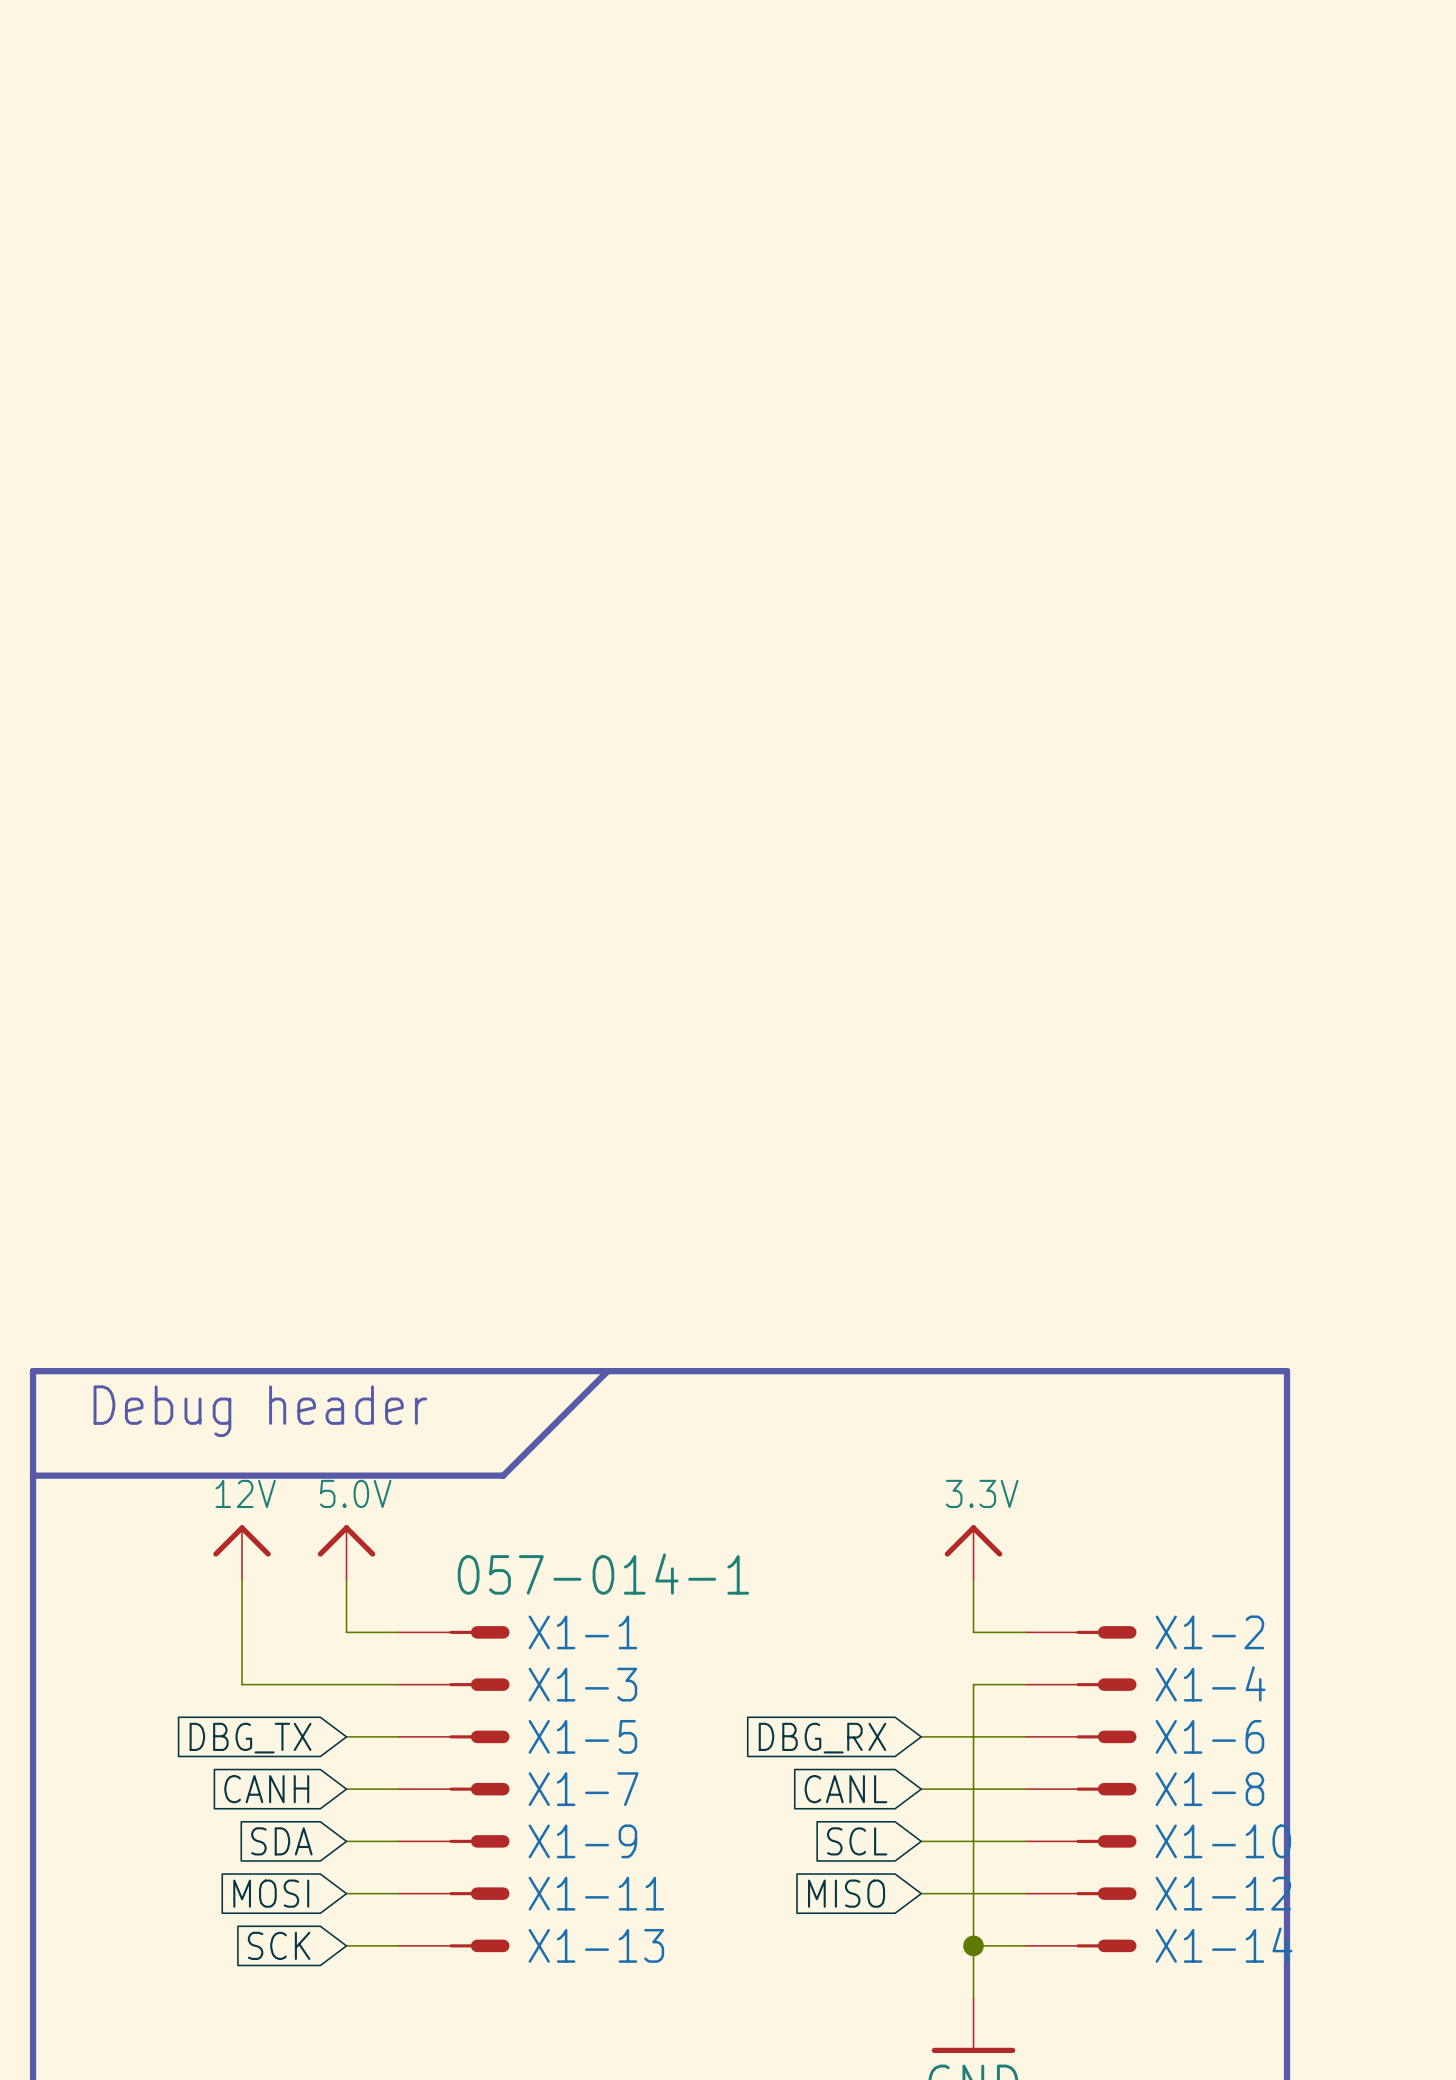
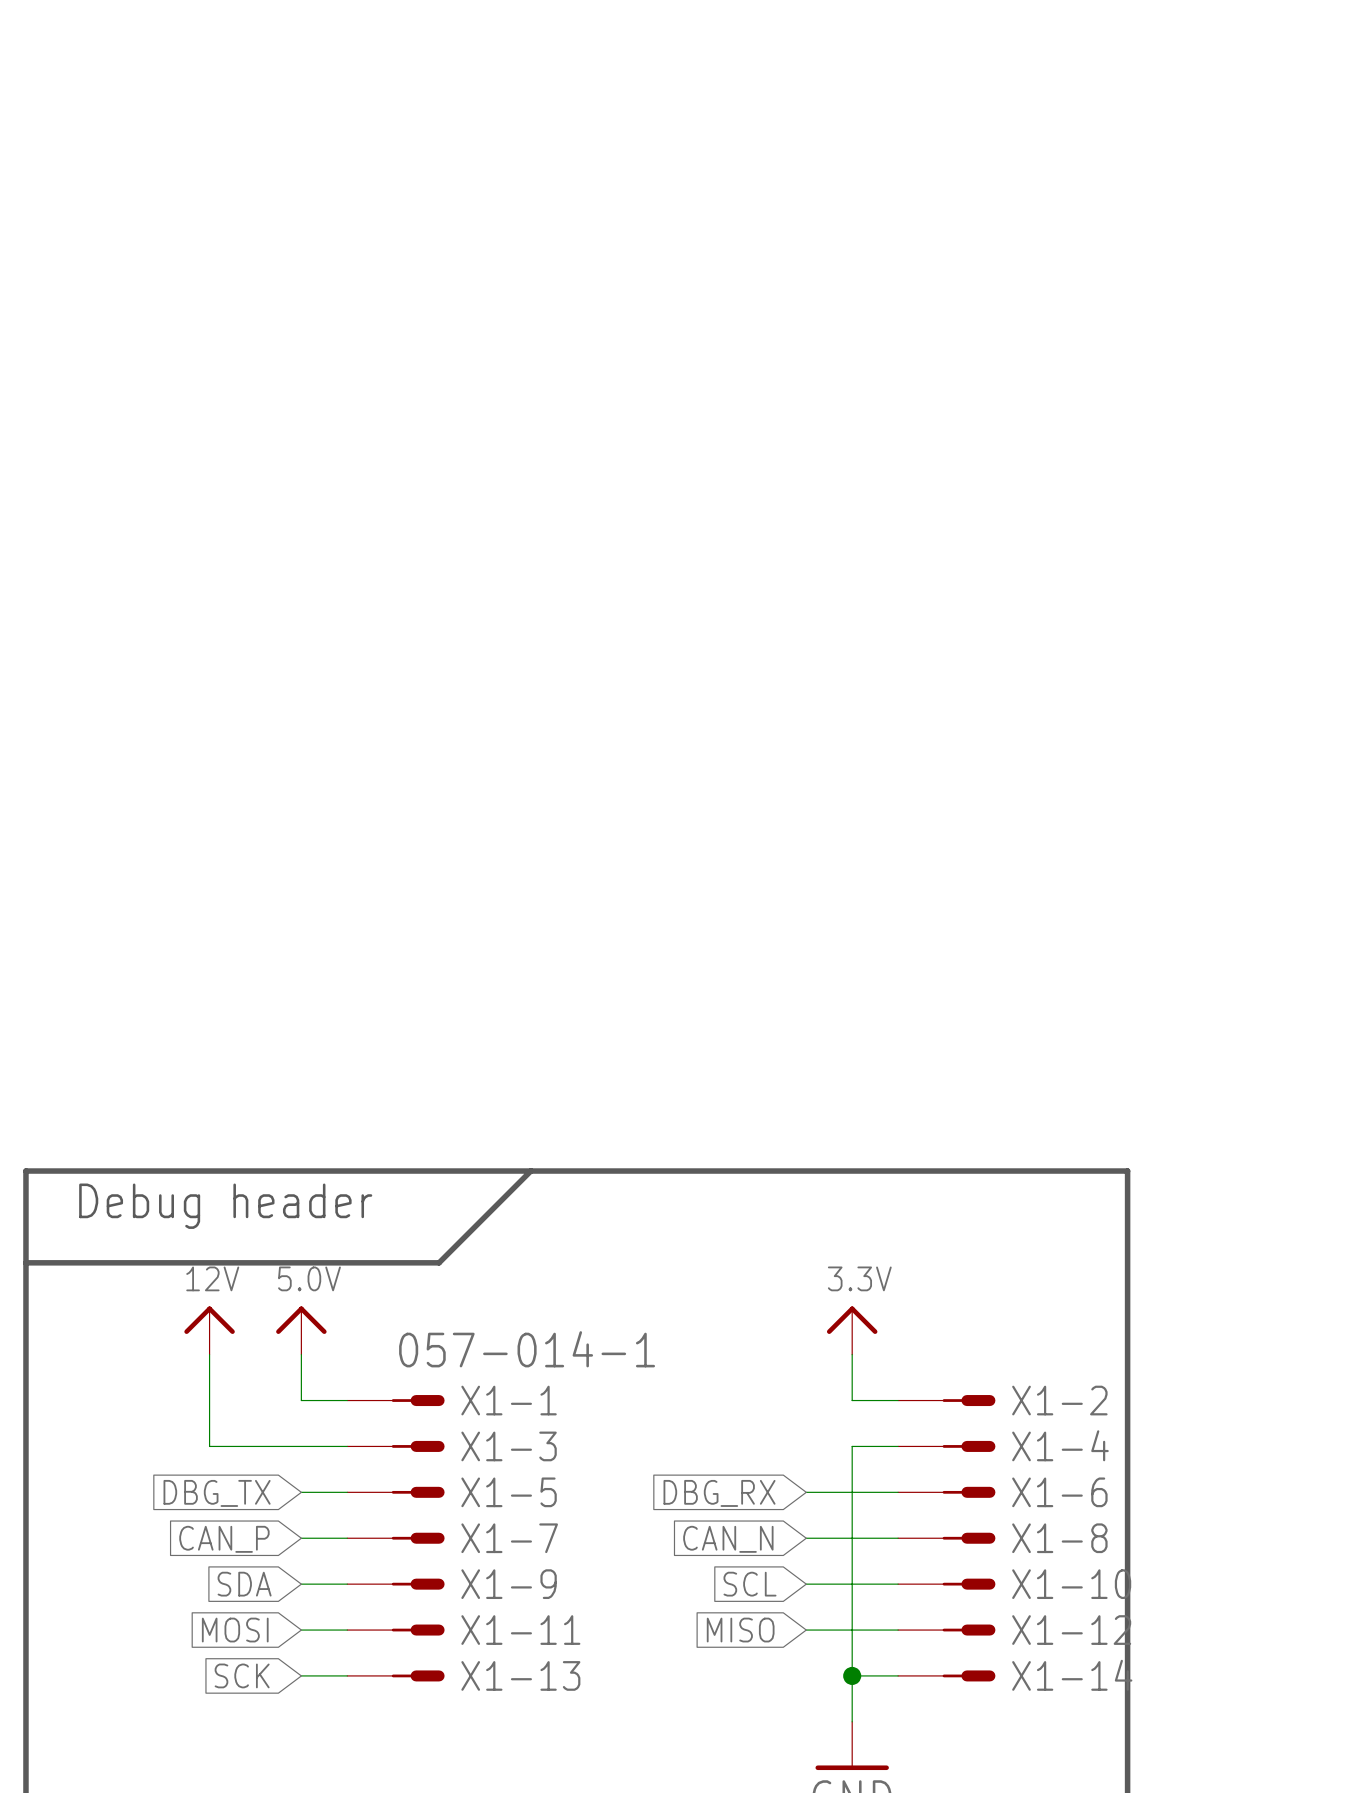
global label: CANH (266, 1789) -> CAN_P (224, 1539)
global label: CANL (845, 1789) -> CAN_N (728, 1539)

